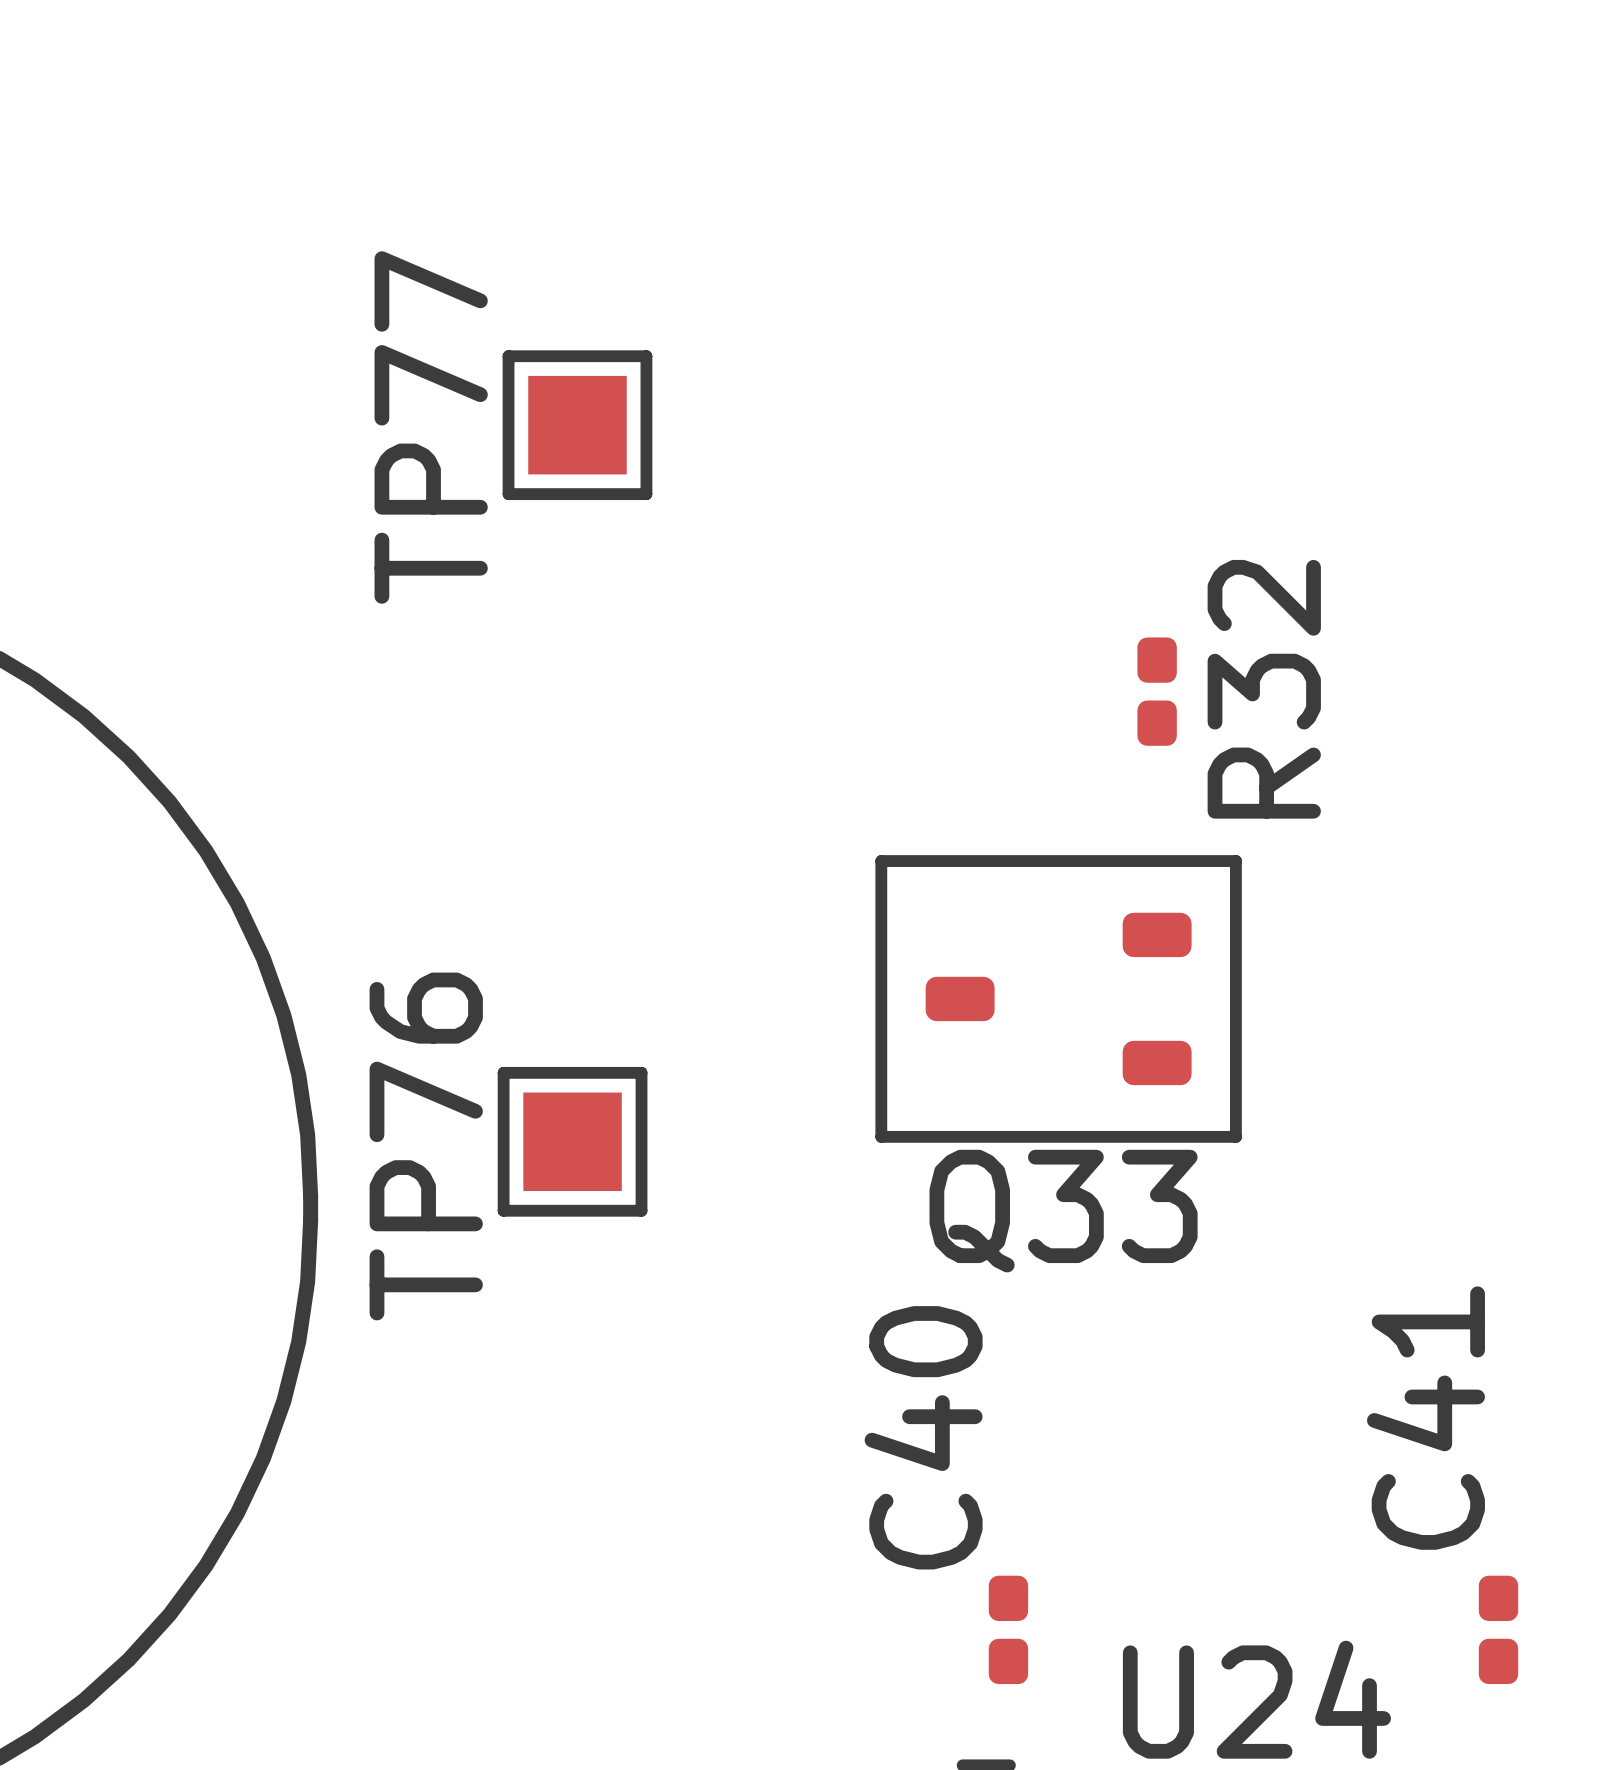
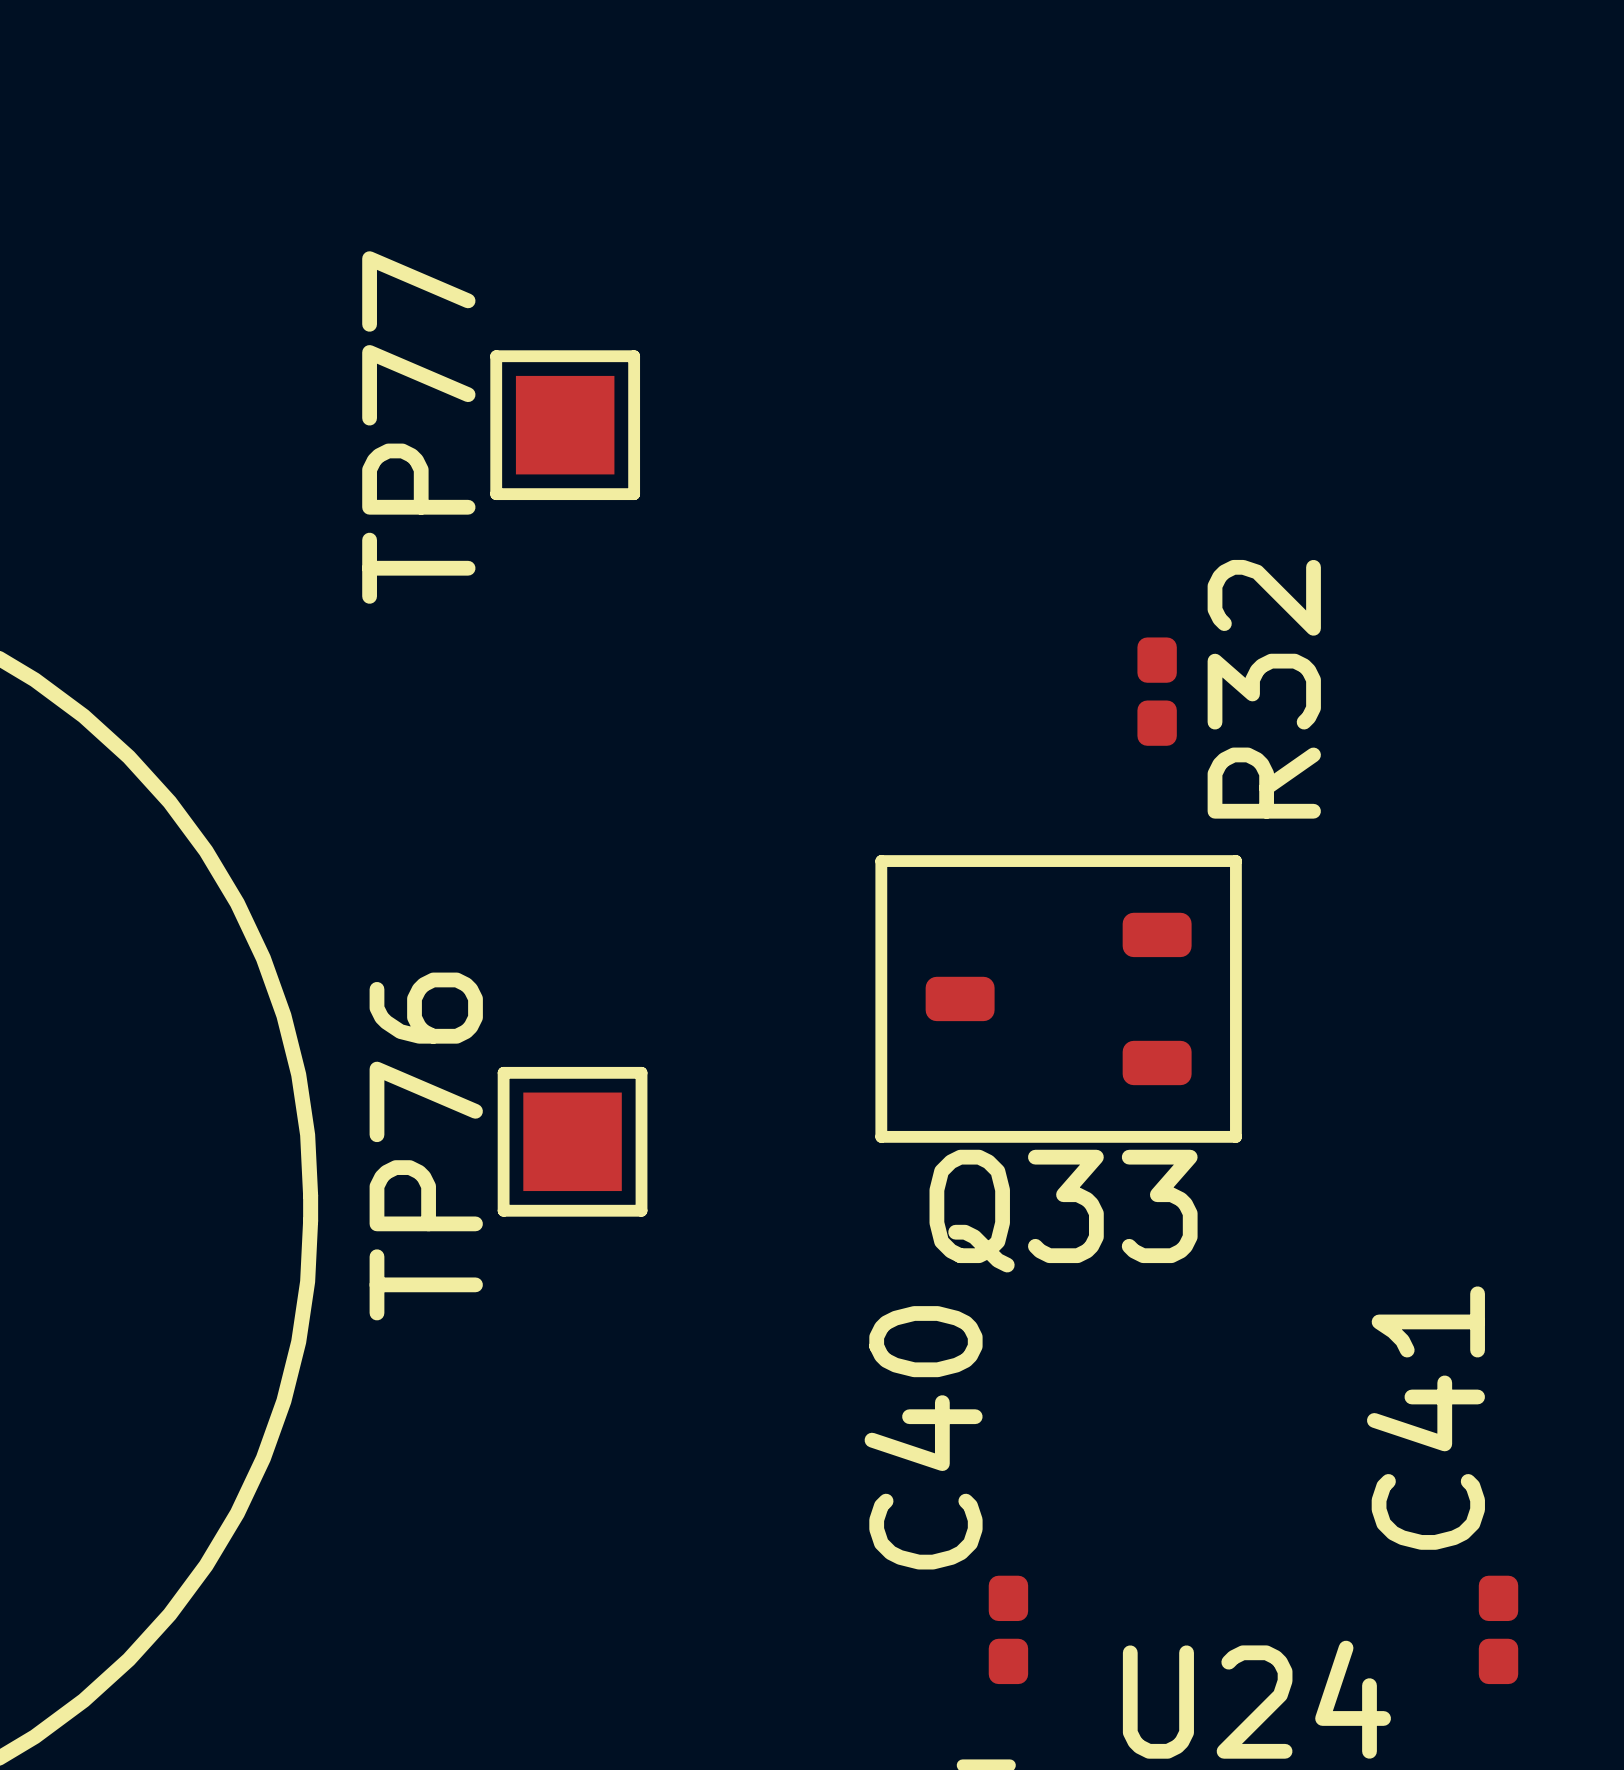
TP77 position: (577, 425) -> (565, 425)

